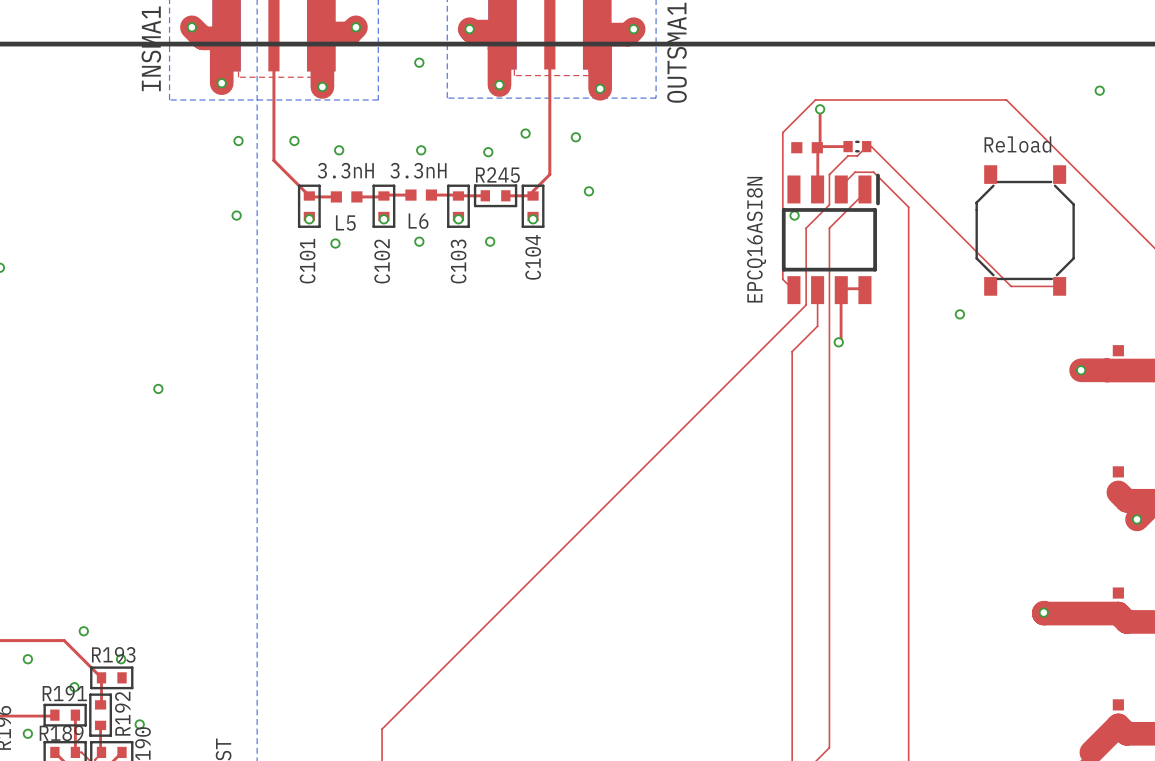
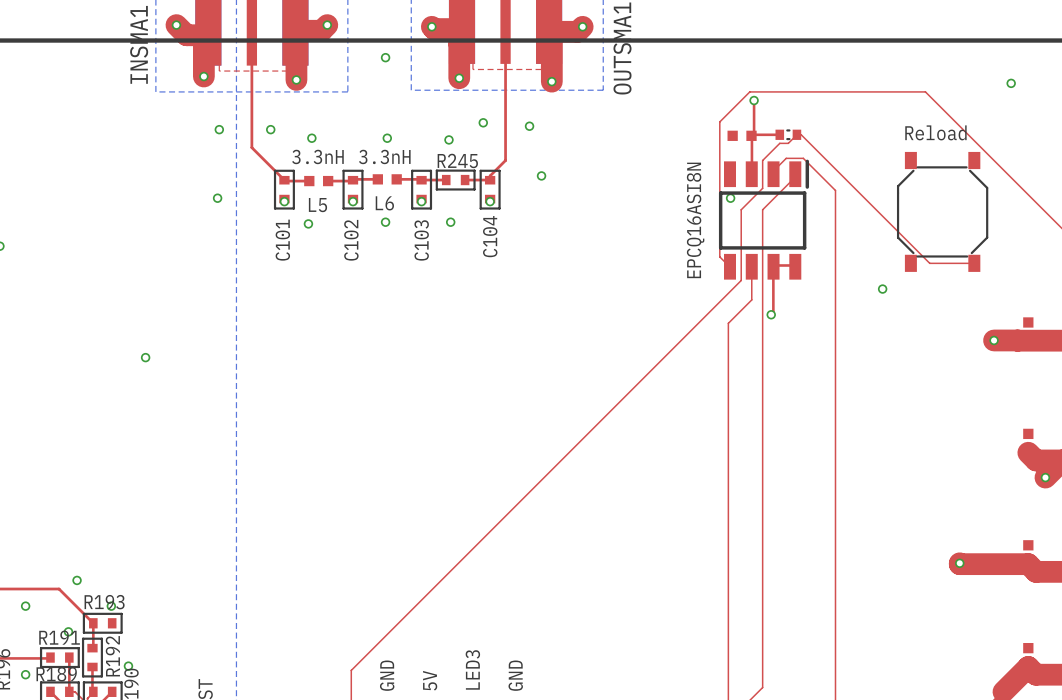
text: none -> LED3 (472, 669)
text: none -> GND (387, 675)
text: none -> GND (515, 675)
text: none -> 5V (430, 680)

